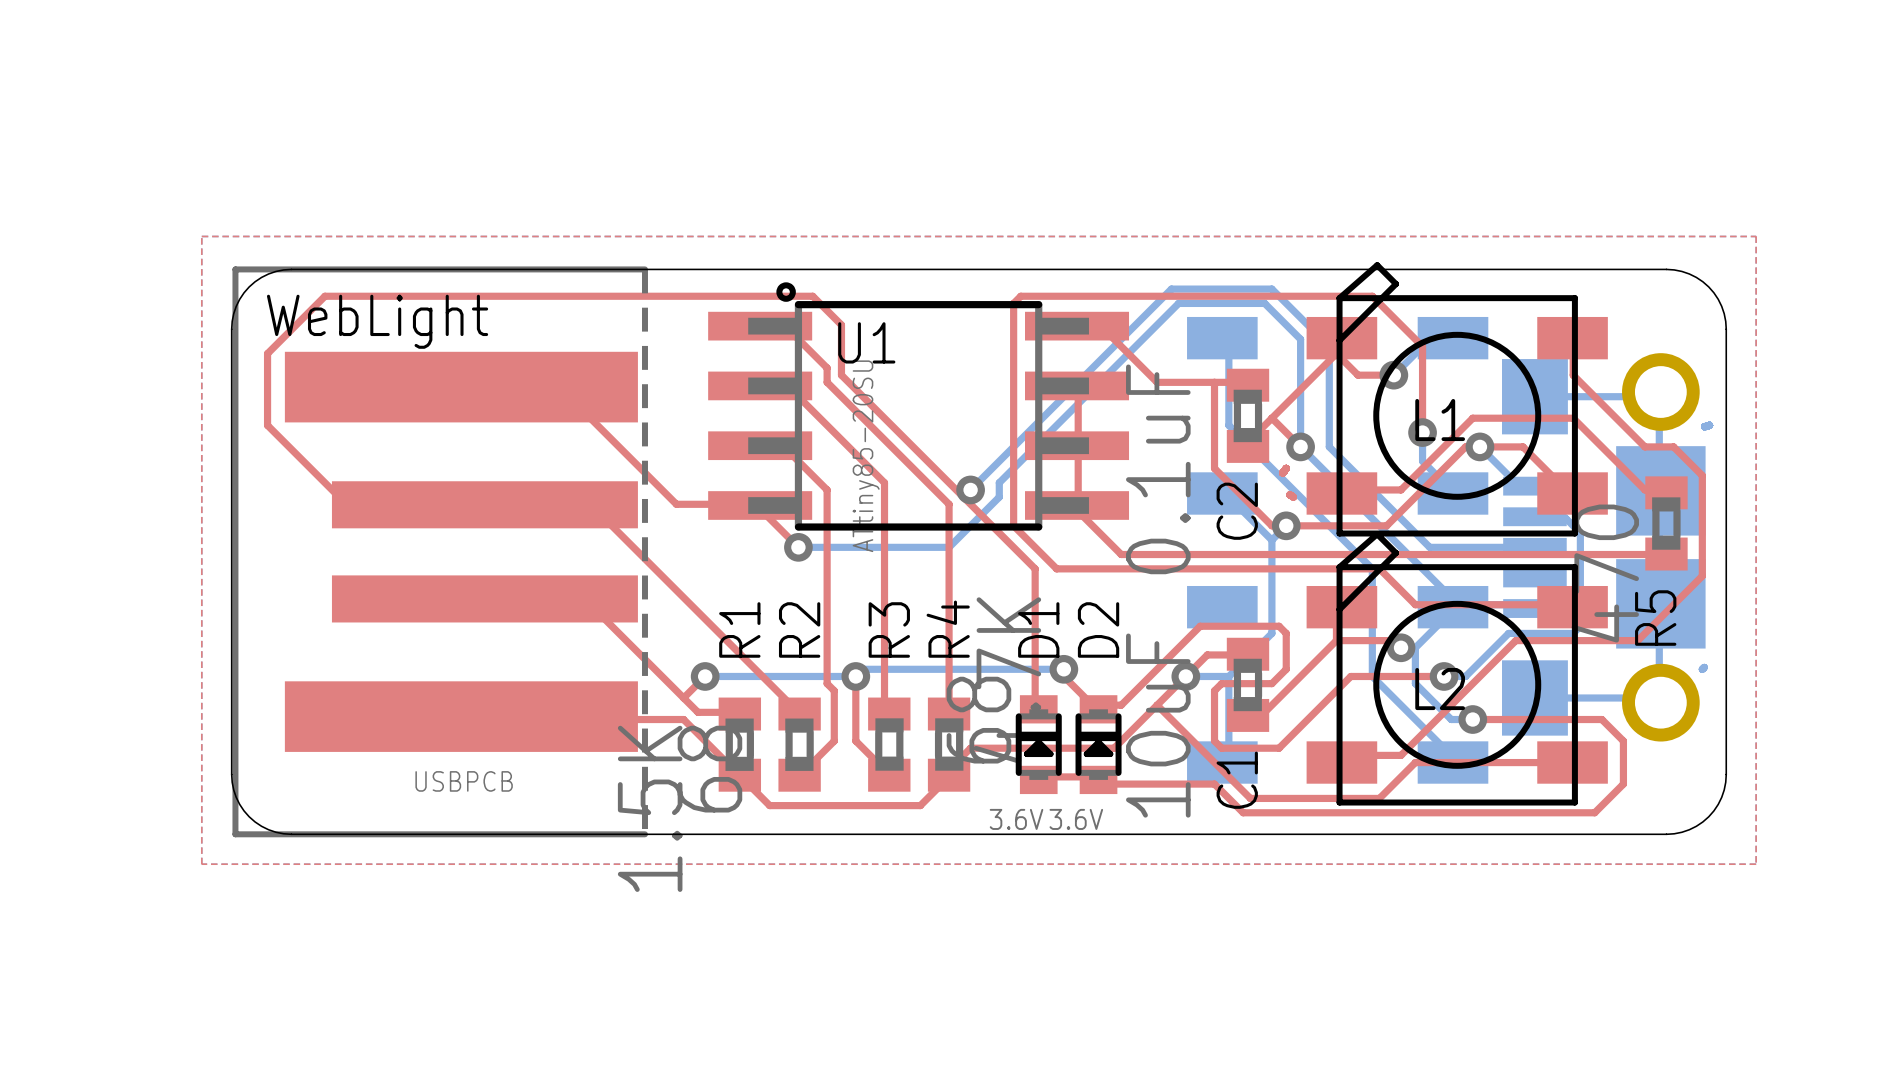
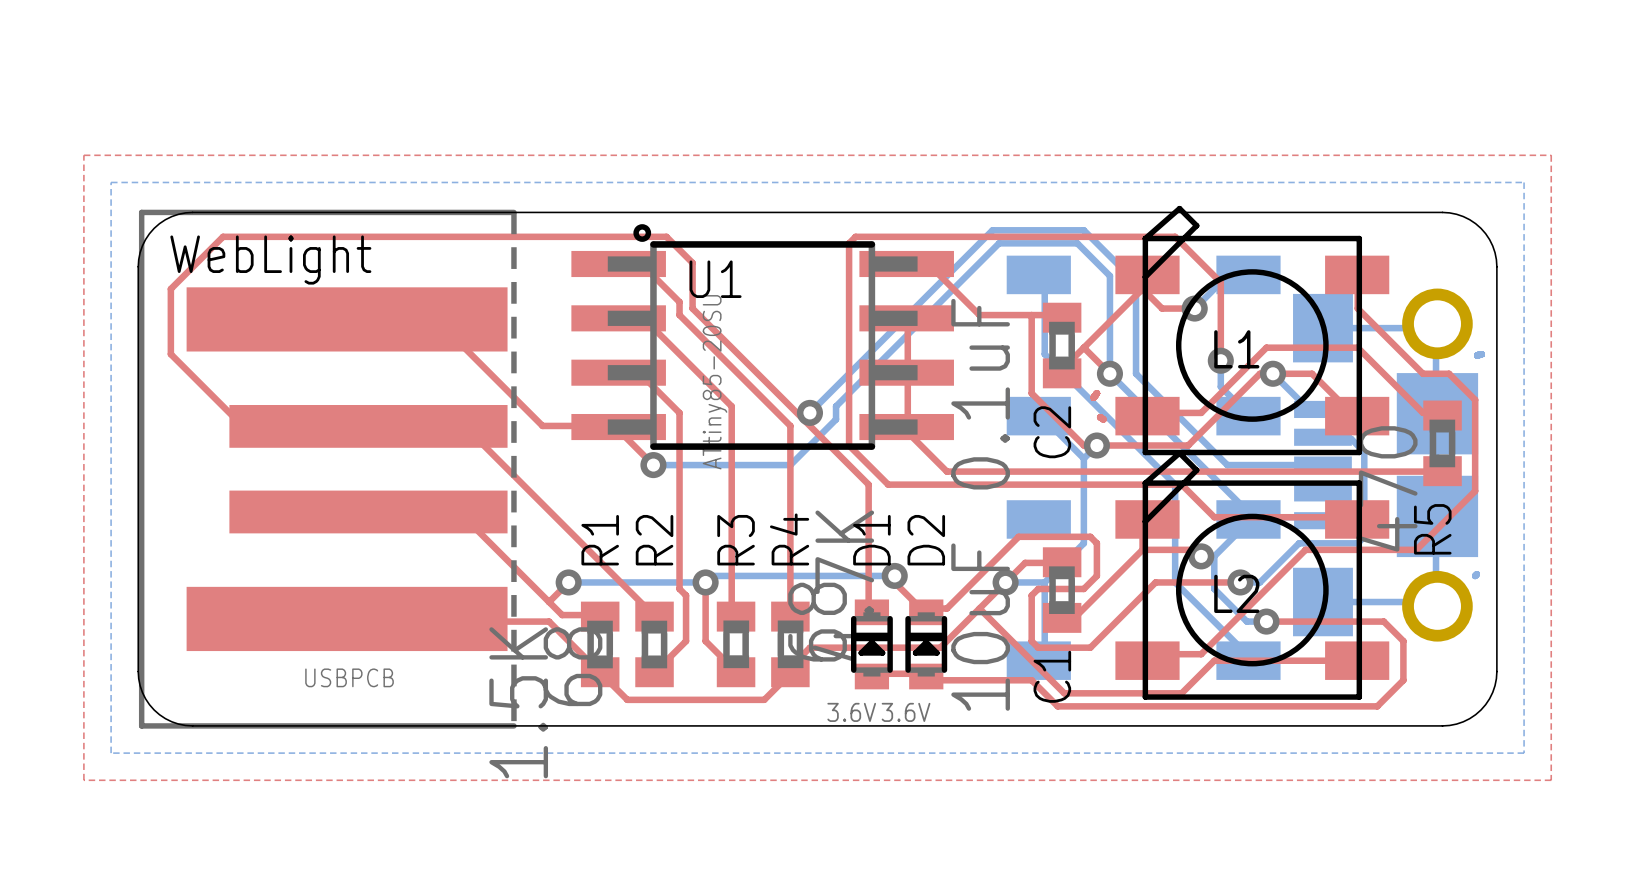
top zone outline: (201, 236) (1756, 236) (1756, 864) (201, 864) (201, 236) -> (83, 155) (83, 780) (1551, 780) (1551, 155) (83, 155)

